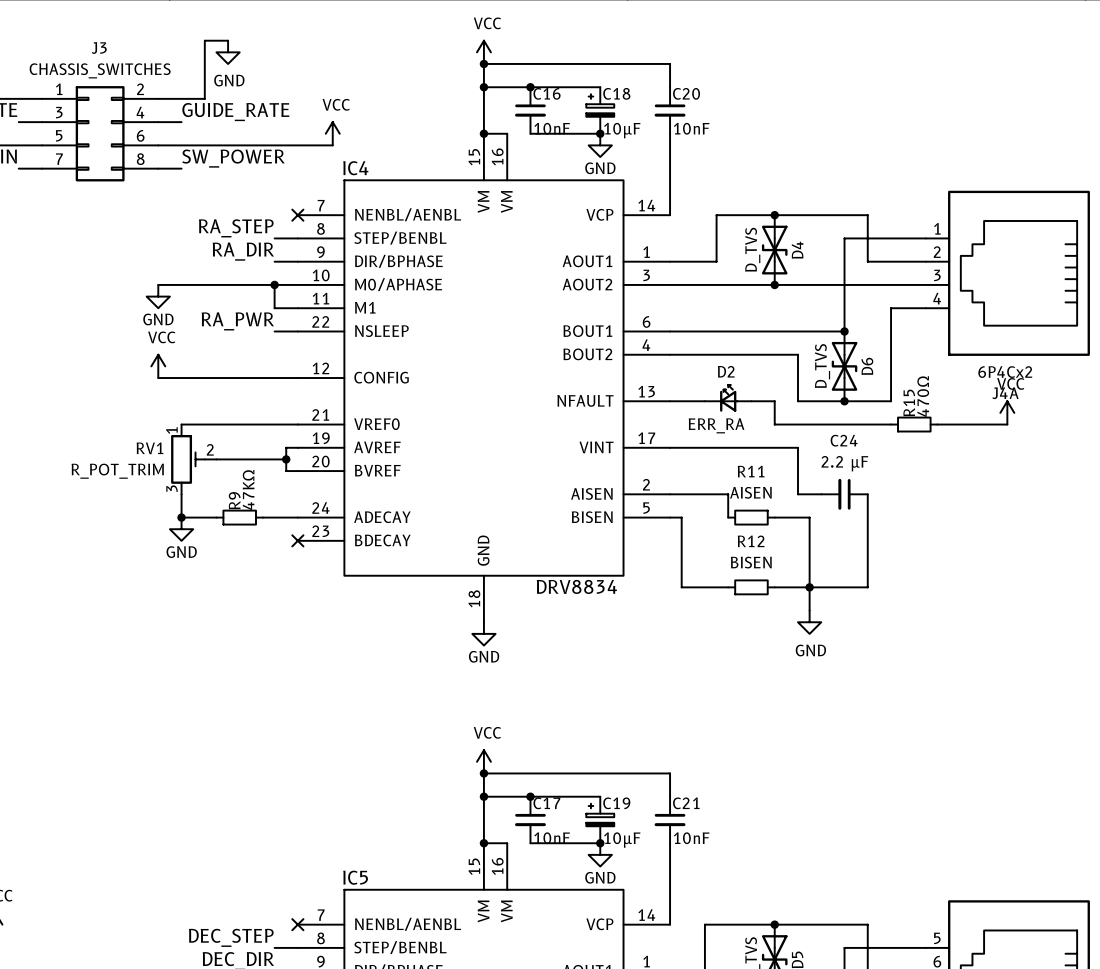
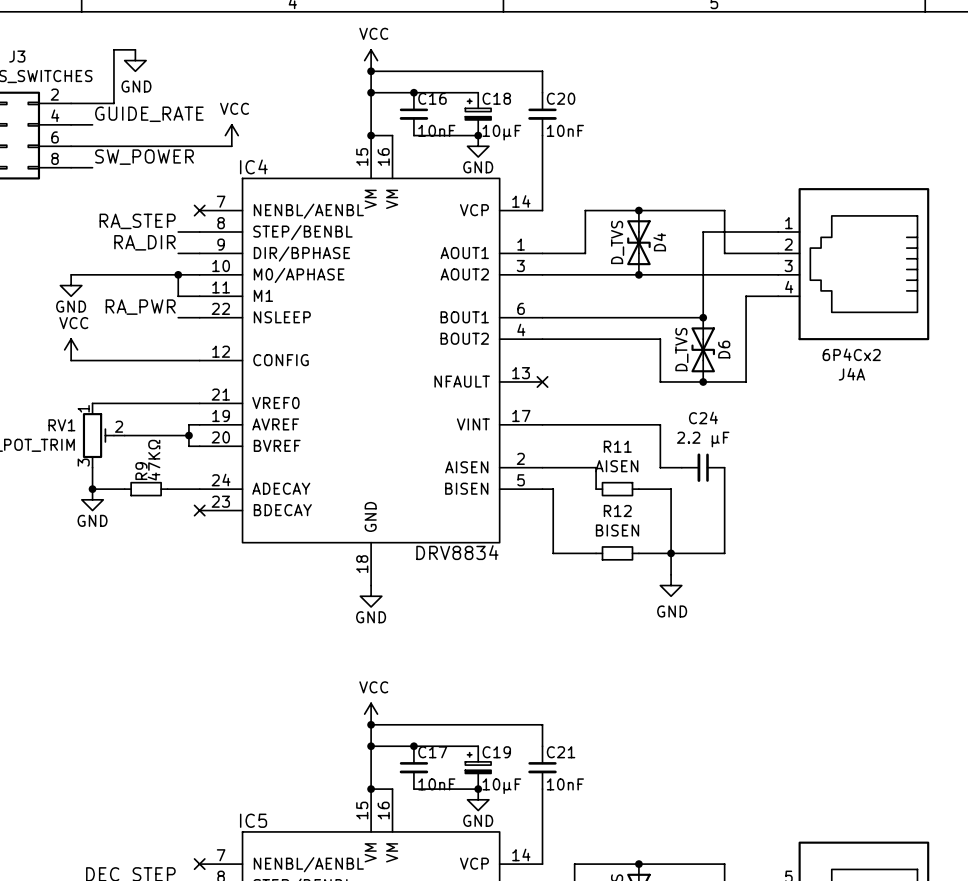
D2: ERR_RA (728, 398) -> none
wire: (670, 401) (704, 401) -> none
no-connect mark: none -> (542, 381)
wire: (751, 401) (774, 401) (774, 424) (891, 424) -> none
power symbol: VCC (1007, 412) -> none
R15: 470Ω (914, 424) -> none
wire: (937, 424) (1007, 424) -> none

